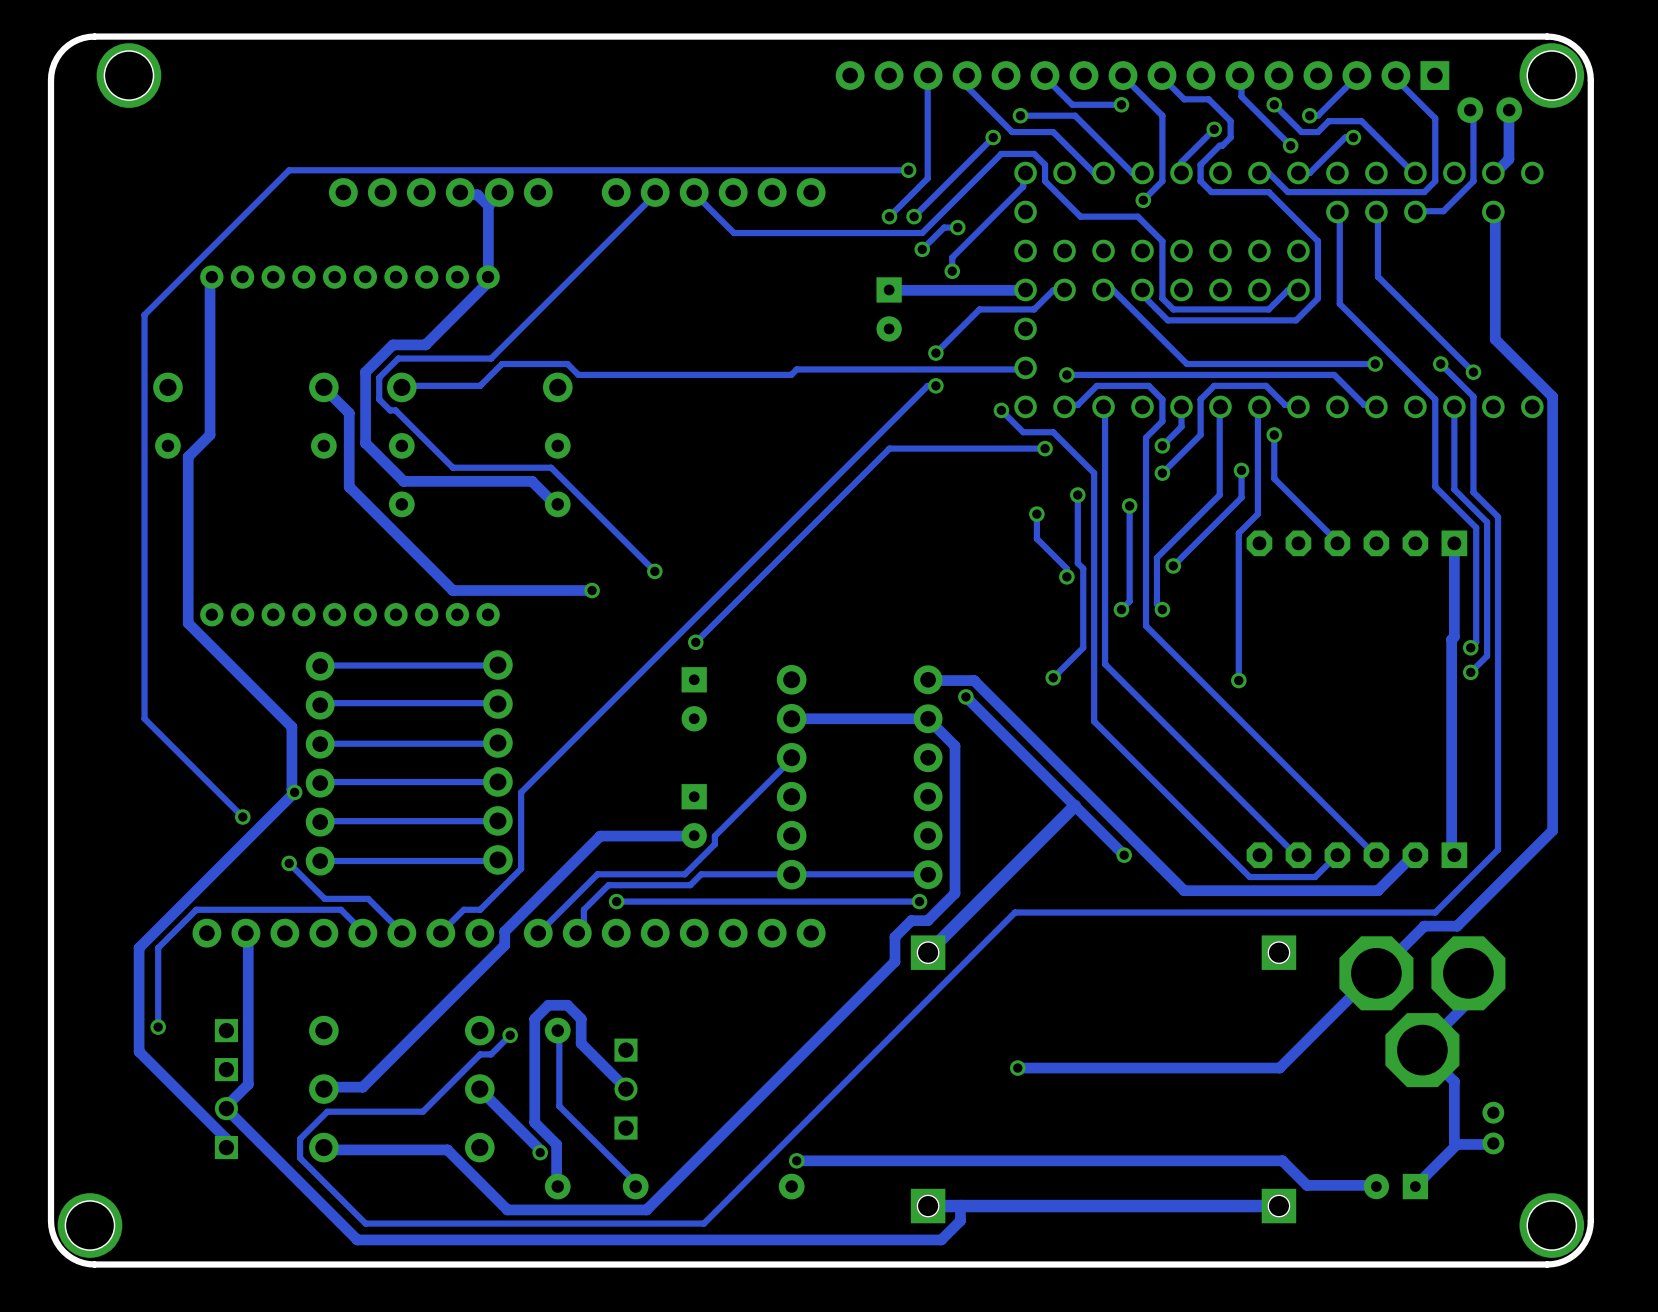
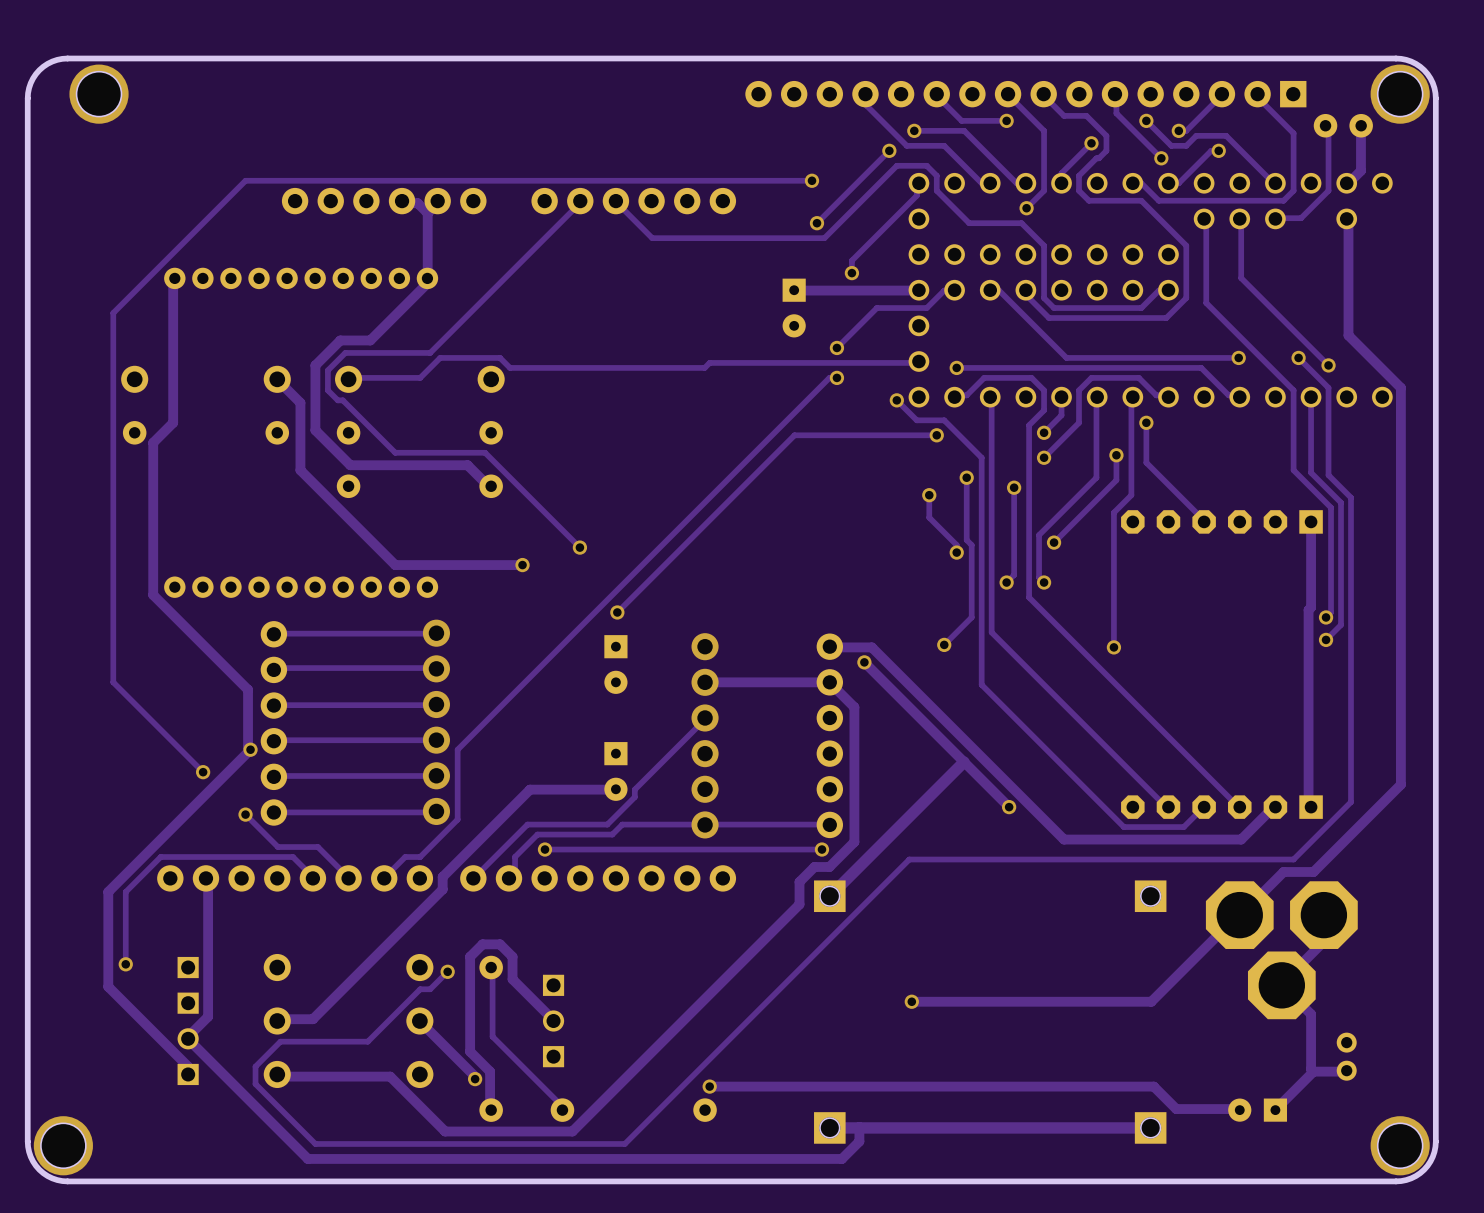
track: (928, 75) (927, 178) (889, 216) -> none
via: (889, 216) -> none
track: (957, 227) (944, 227) (922, 249) -> none
via: (957, 227) -> none
via: (922, 249) -> none

